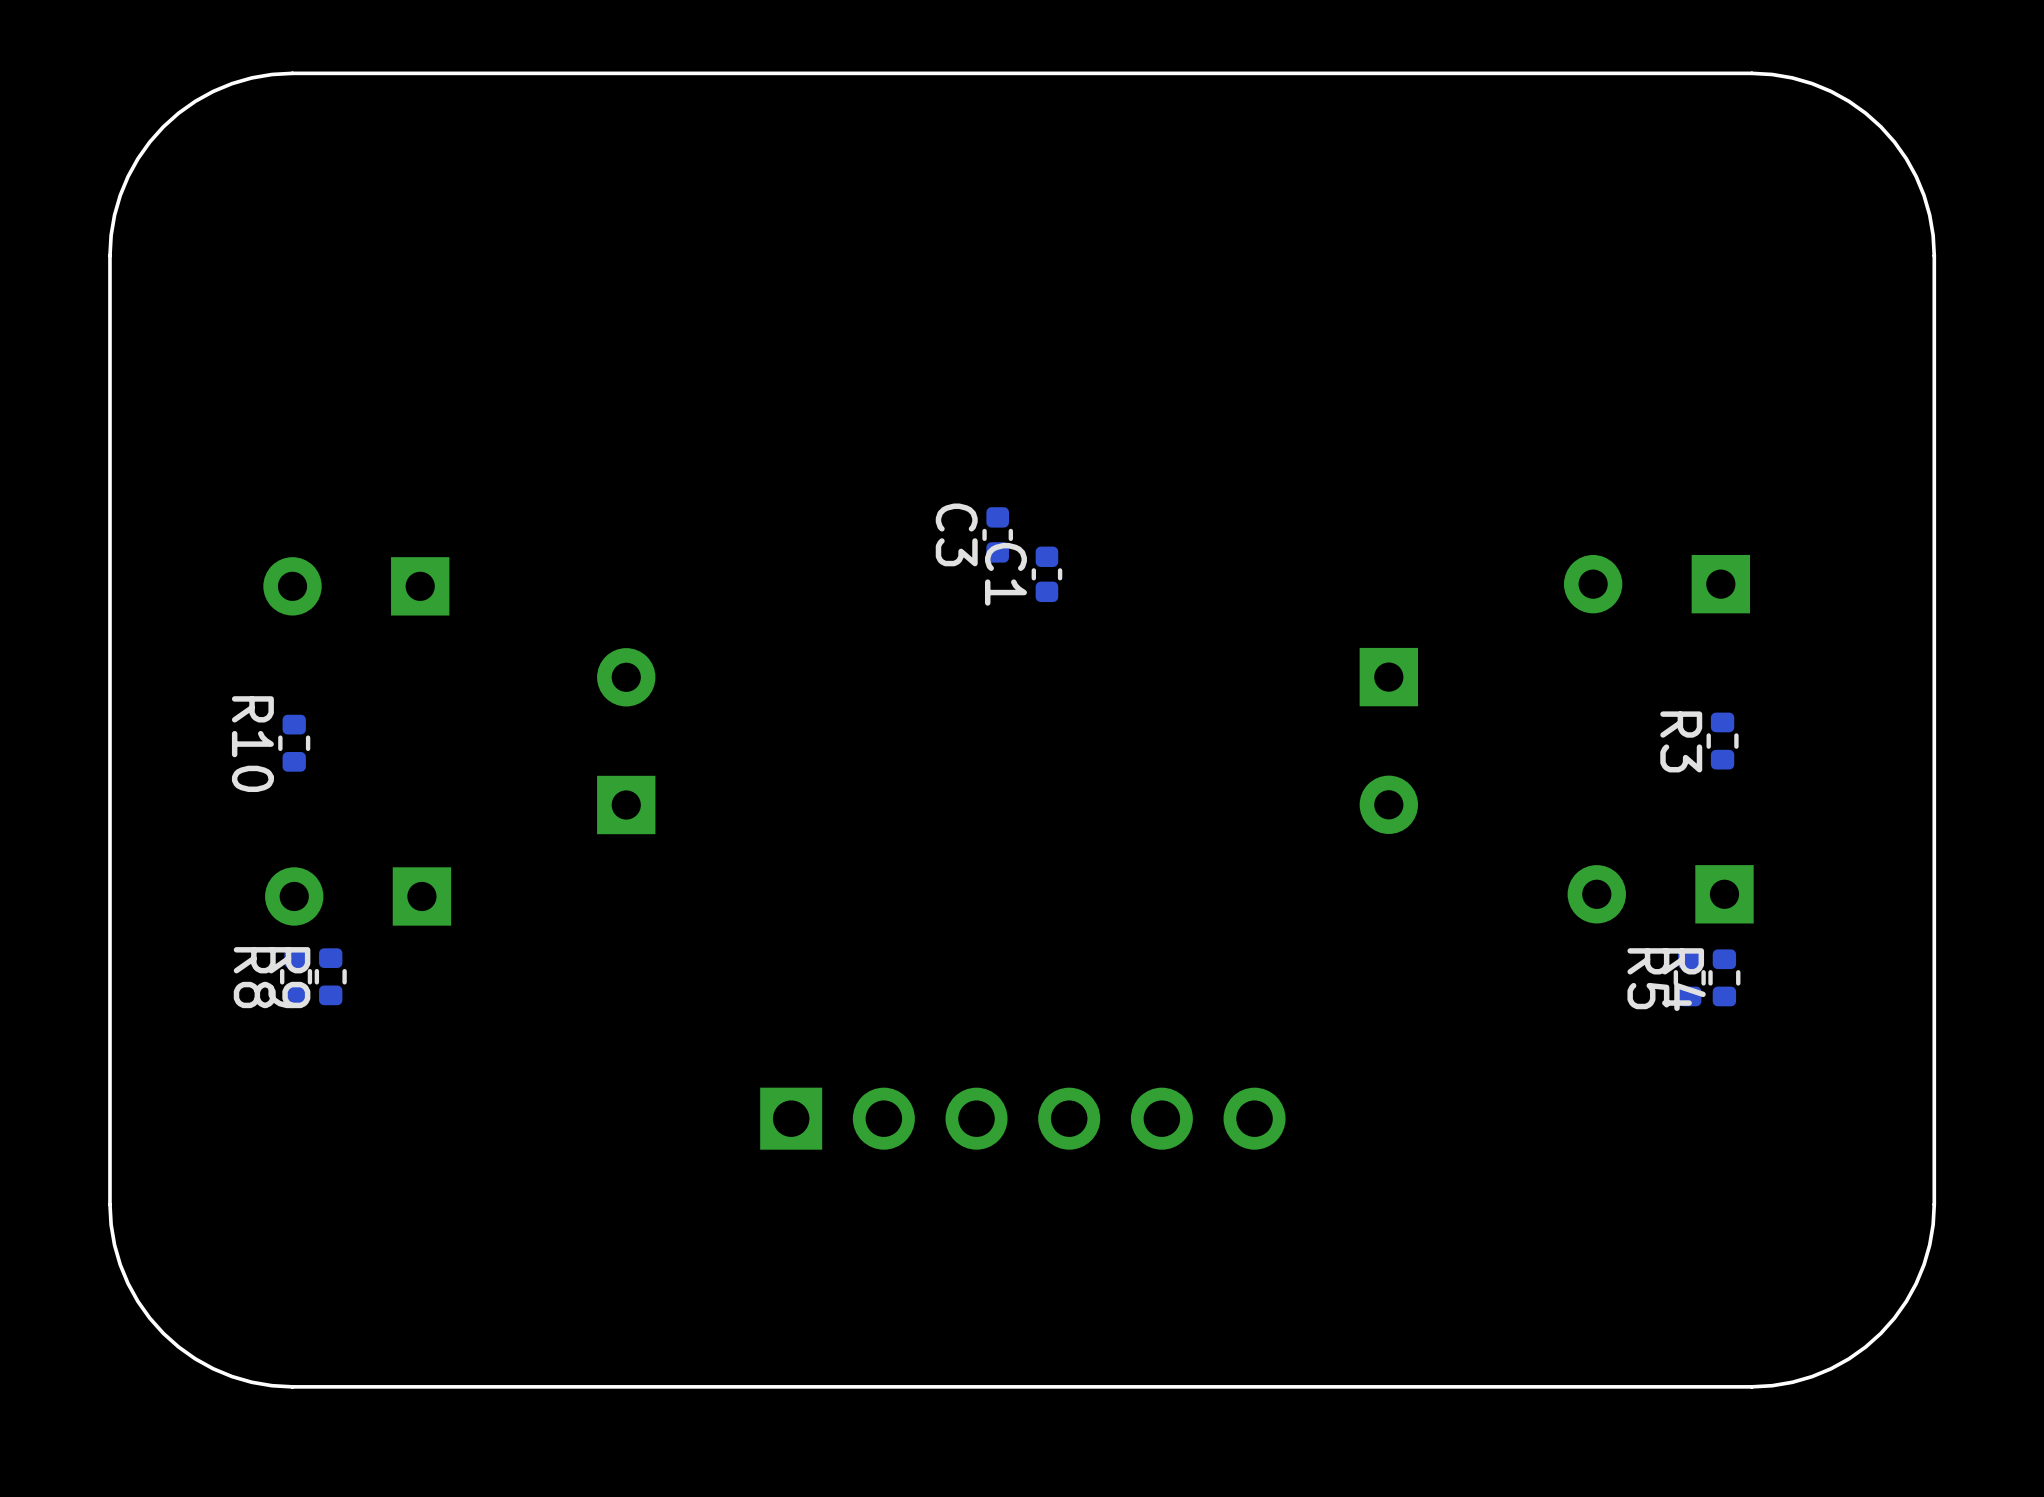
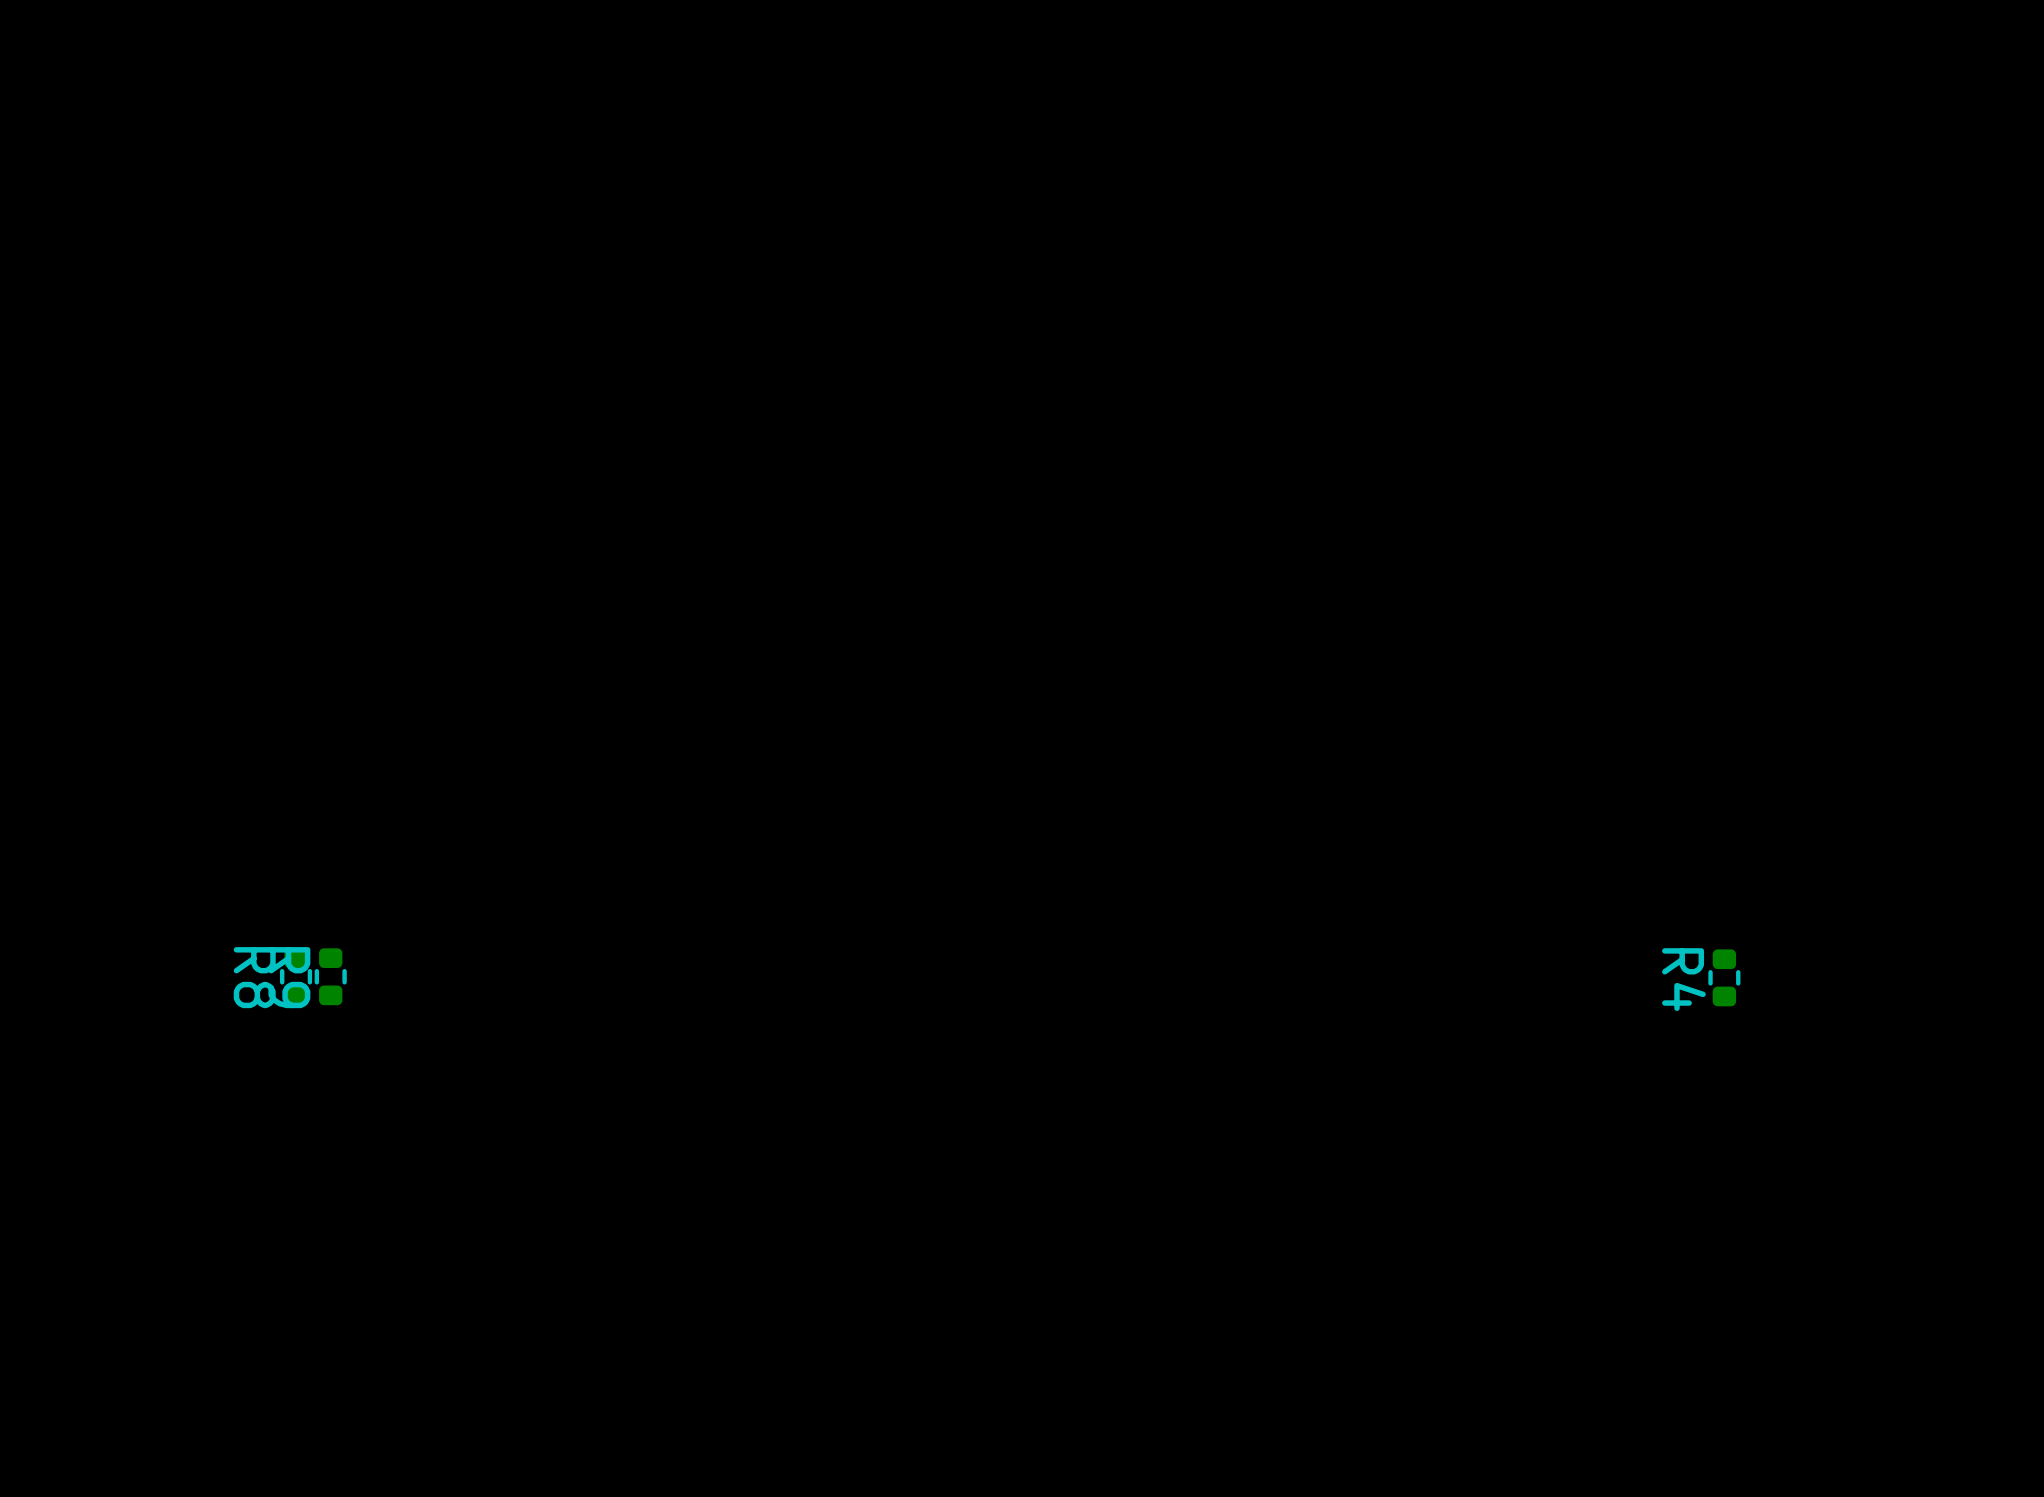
board edge: (1751, 73) (292, 73) (271, 74) (232, 83) (213, 91) (178, 113) (149, 142) (128, 176) (114, 215) (109, 255) (109, 1204) (111, 1224) (120, 1264) (137, 1301) (149, 1318) (178, 1347) (213, 1368) (251, 1382) (292, 1386) (1751, 1386) (1772, 1385) (1812, 1376) (1848, 1358) (1865, 1347) (1894, 1318) (1916, 1283) (1929, 1245) (1933, 1224) (1933, 235) (1929, 215) (1916, 176) (1894, 142) (1880, 126) (1865, 113) (1831, 91) (1792, 77) (1751, 73) -> none
C3: (997, 534) -> none
C1: (1046, 574) -> none
part: (1656, 584) -> none
part: (356, 586) -> none
part: (1388, 740) -> none
part: (626, 741) -> none
R3: (1722, 741) -> none
R10: (294, 743) -> none
part: (1660, 894) -> none
part: (358, 896) -> none
R5: (1689, 977) -> none
part: (1022, 1118) -> none

